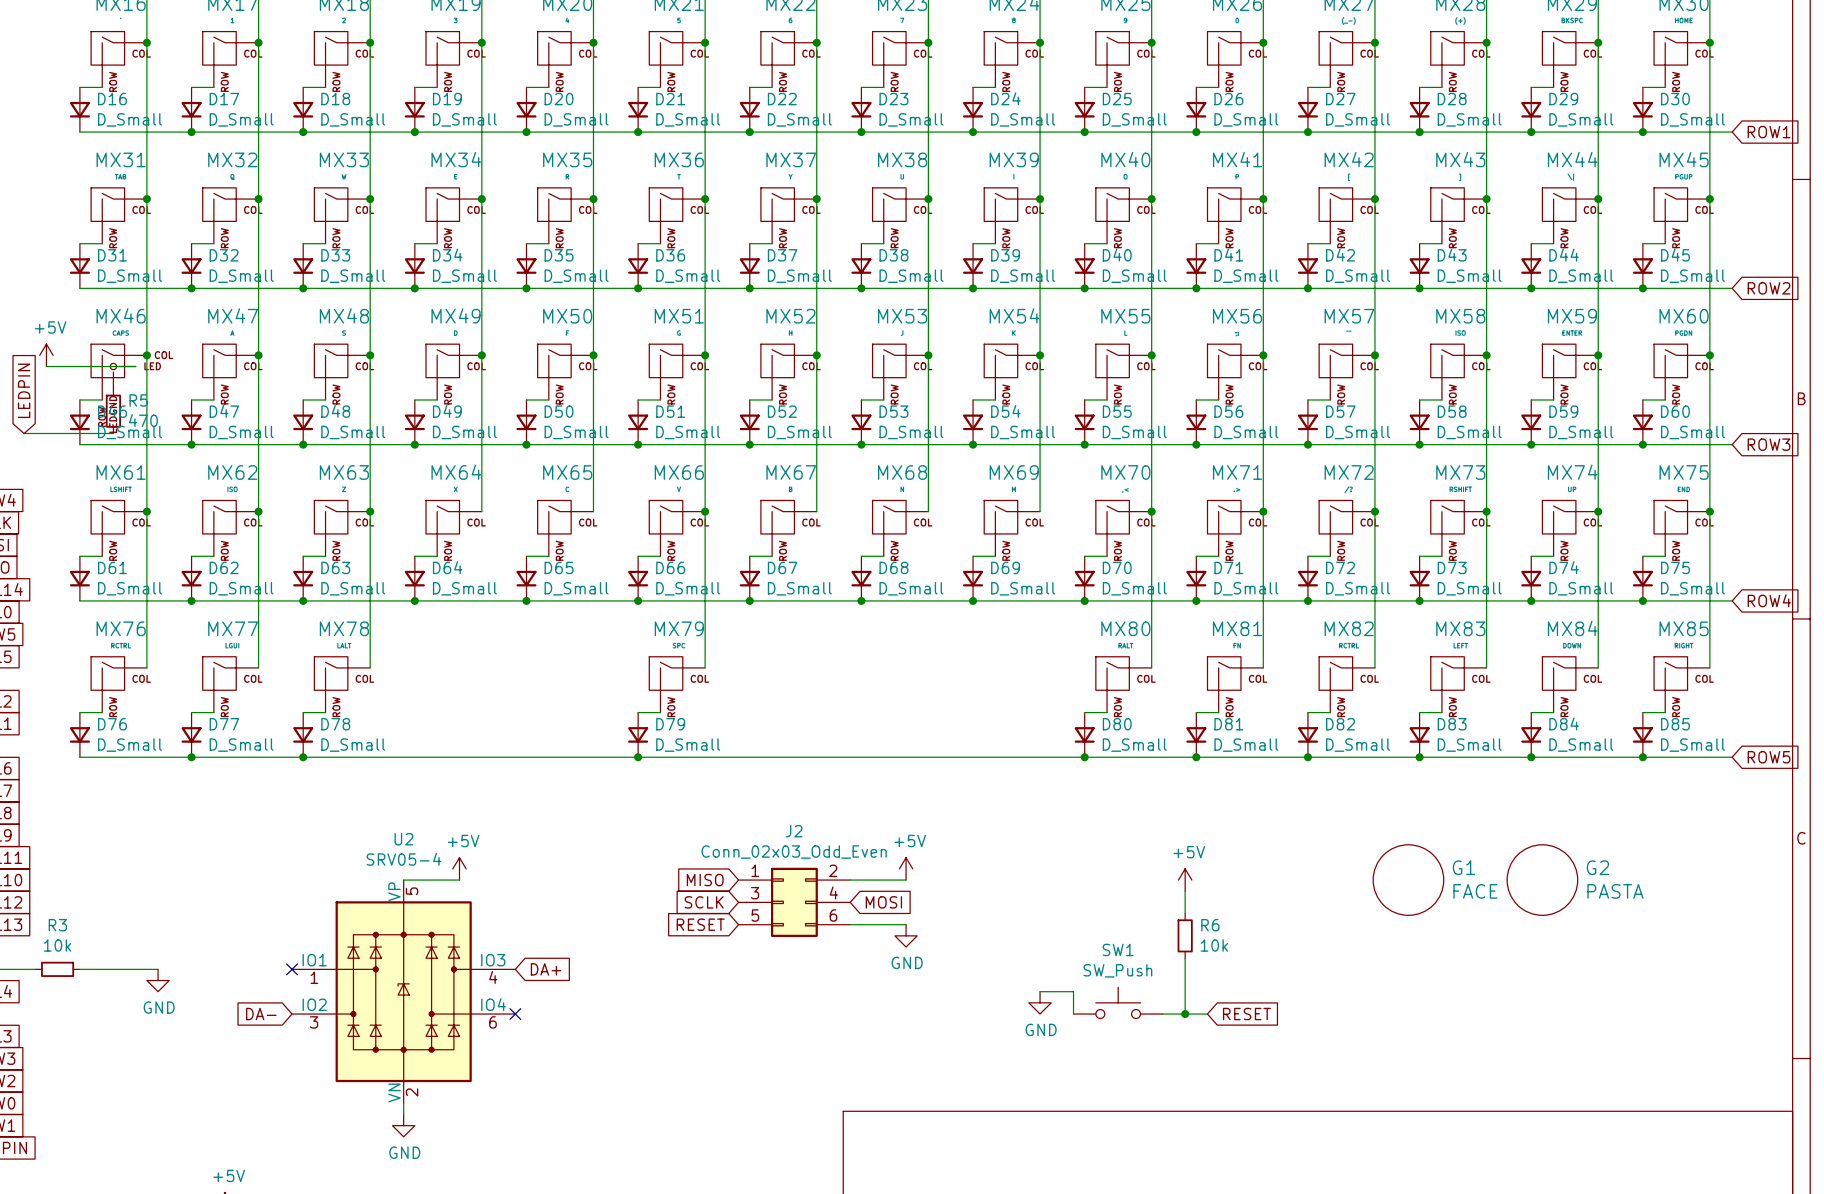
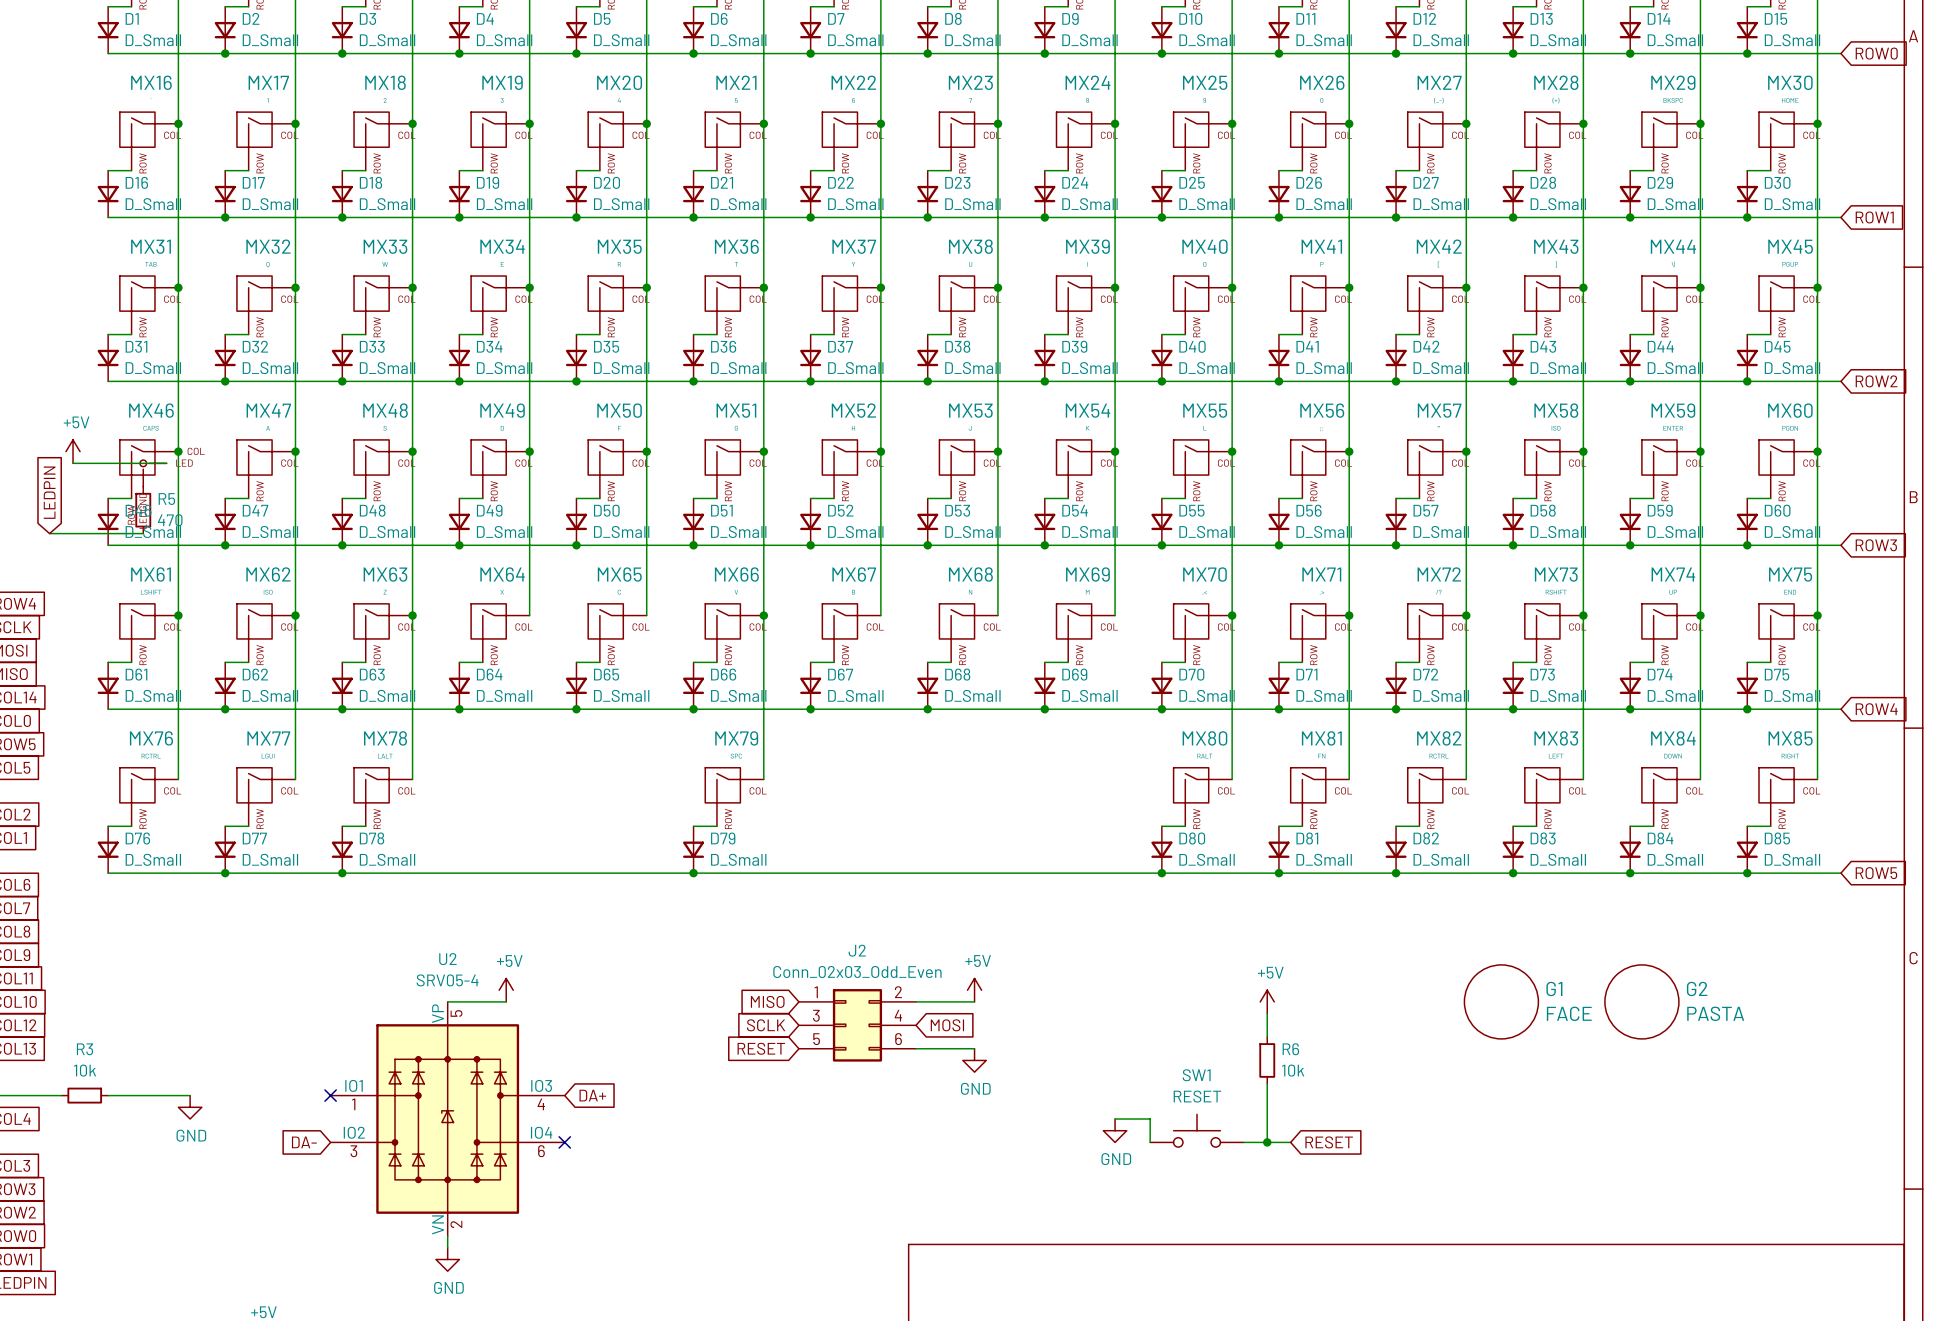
SW1 value: SW_Push (1117, 970) -> RESET (1197, 1096)

